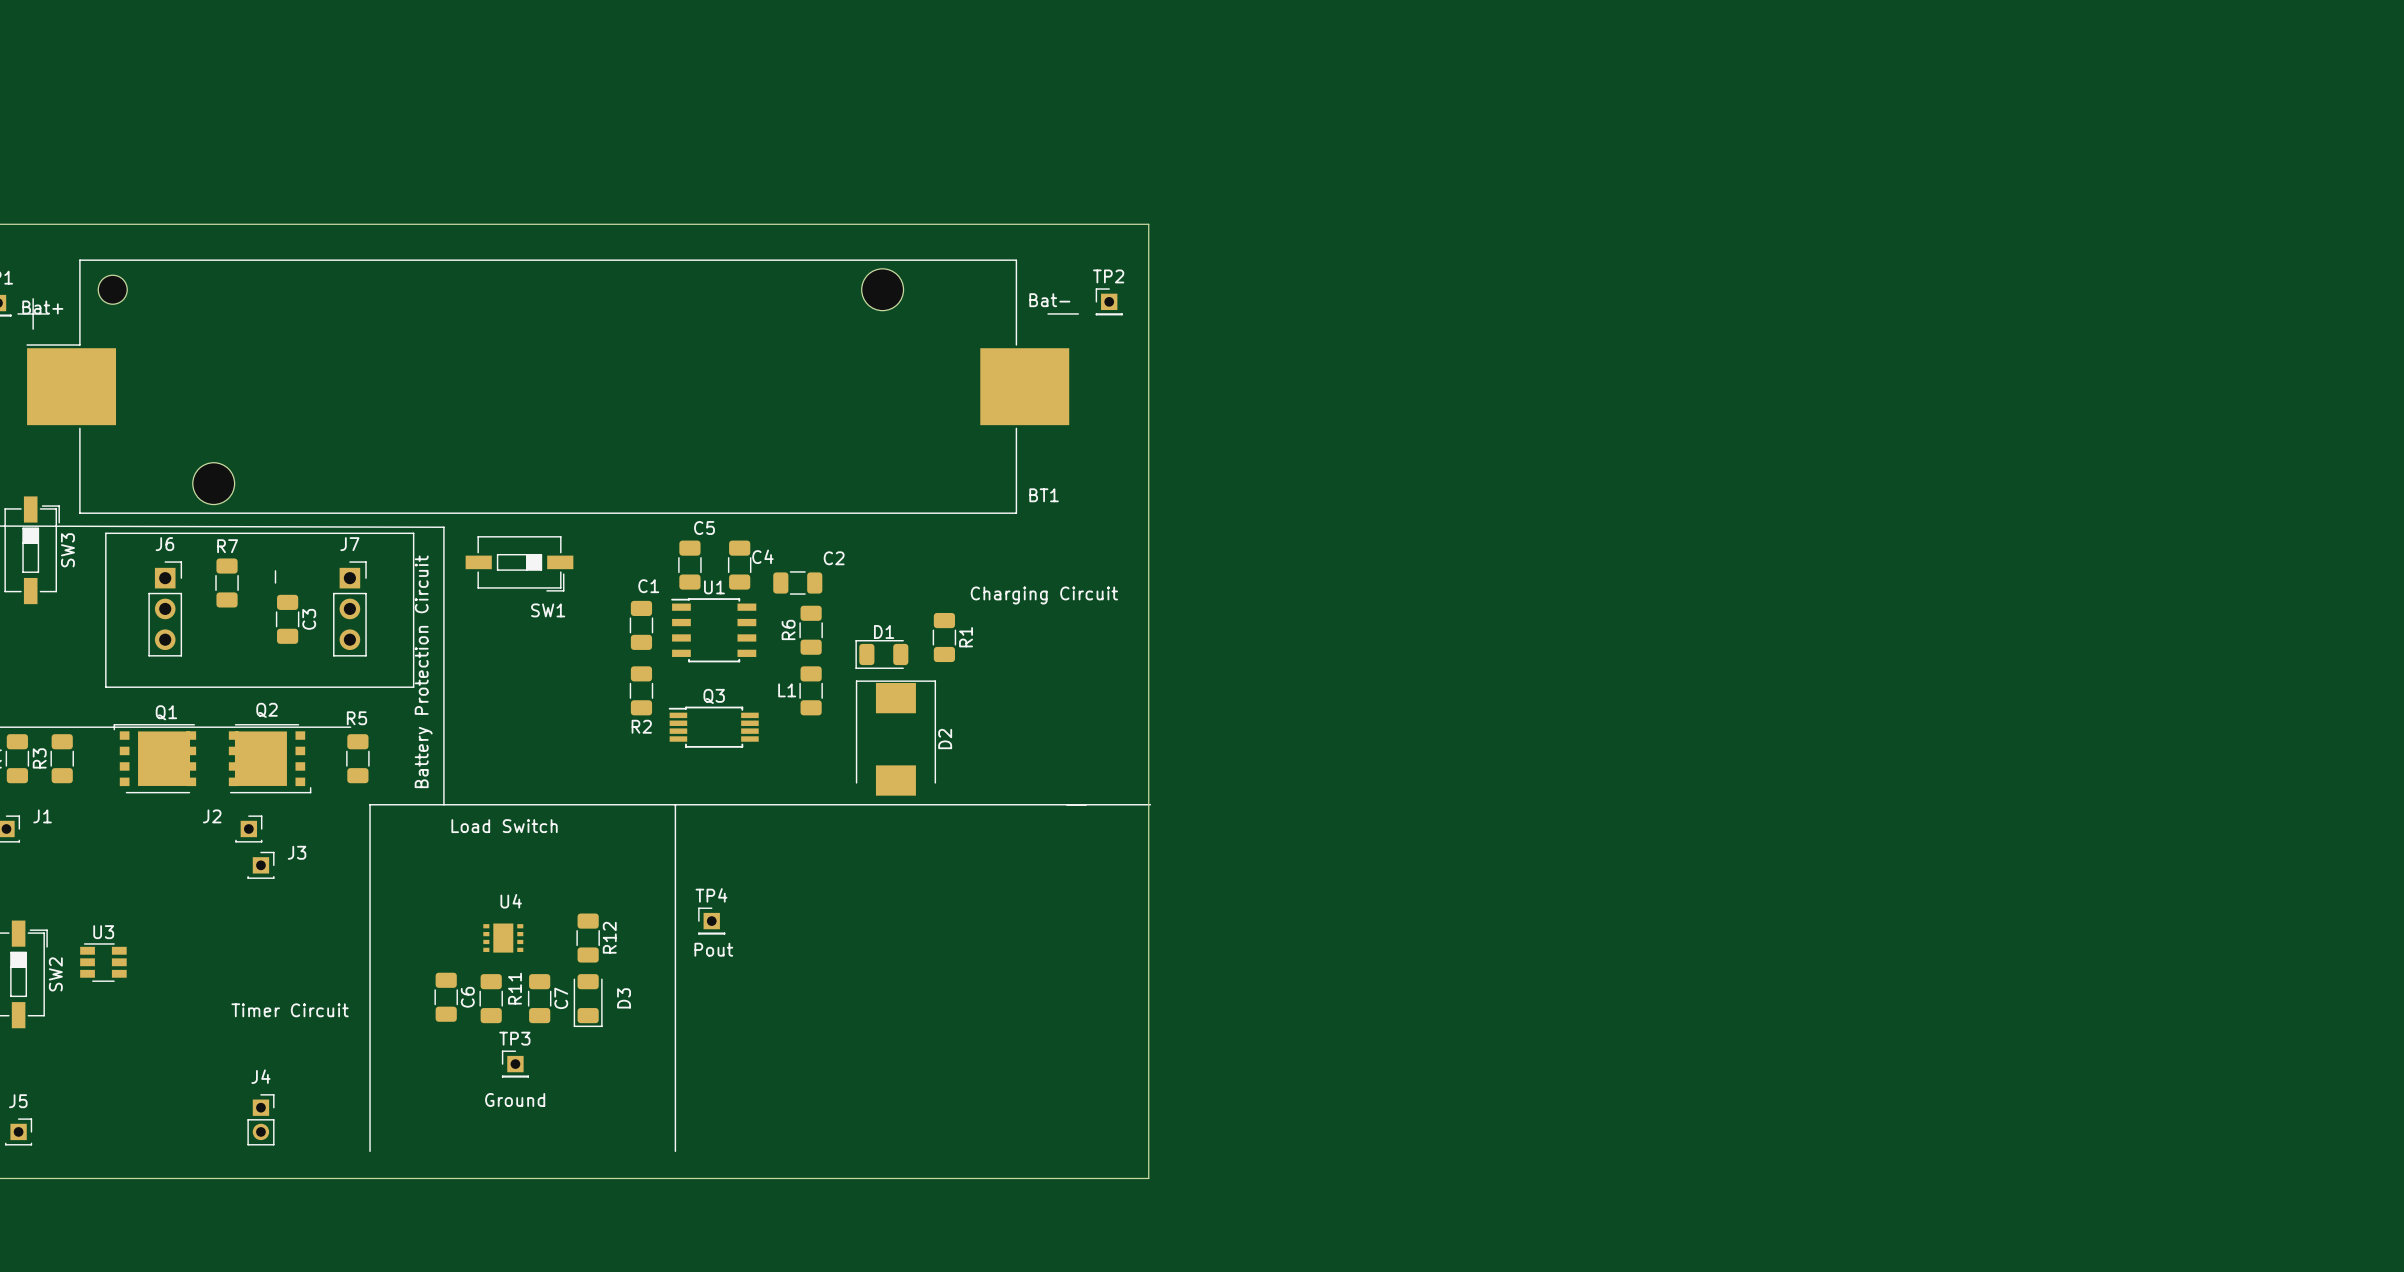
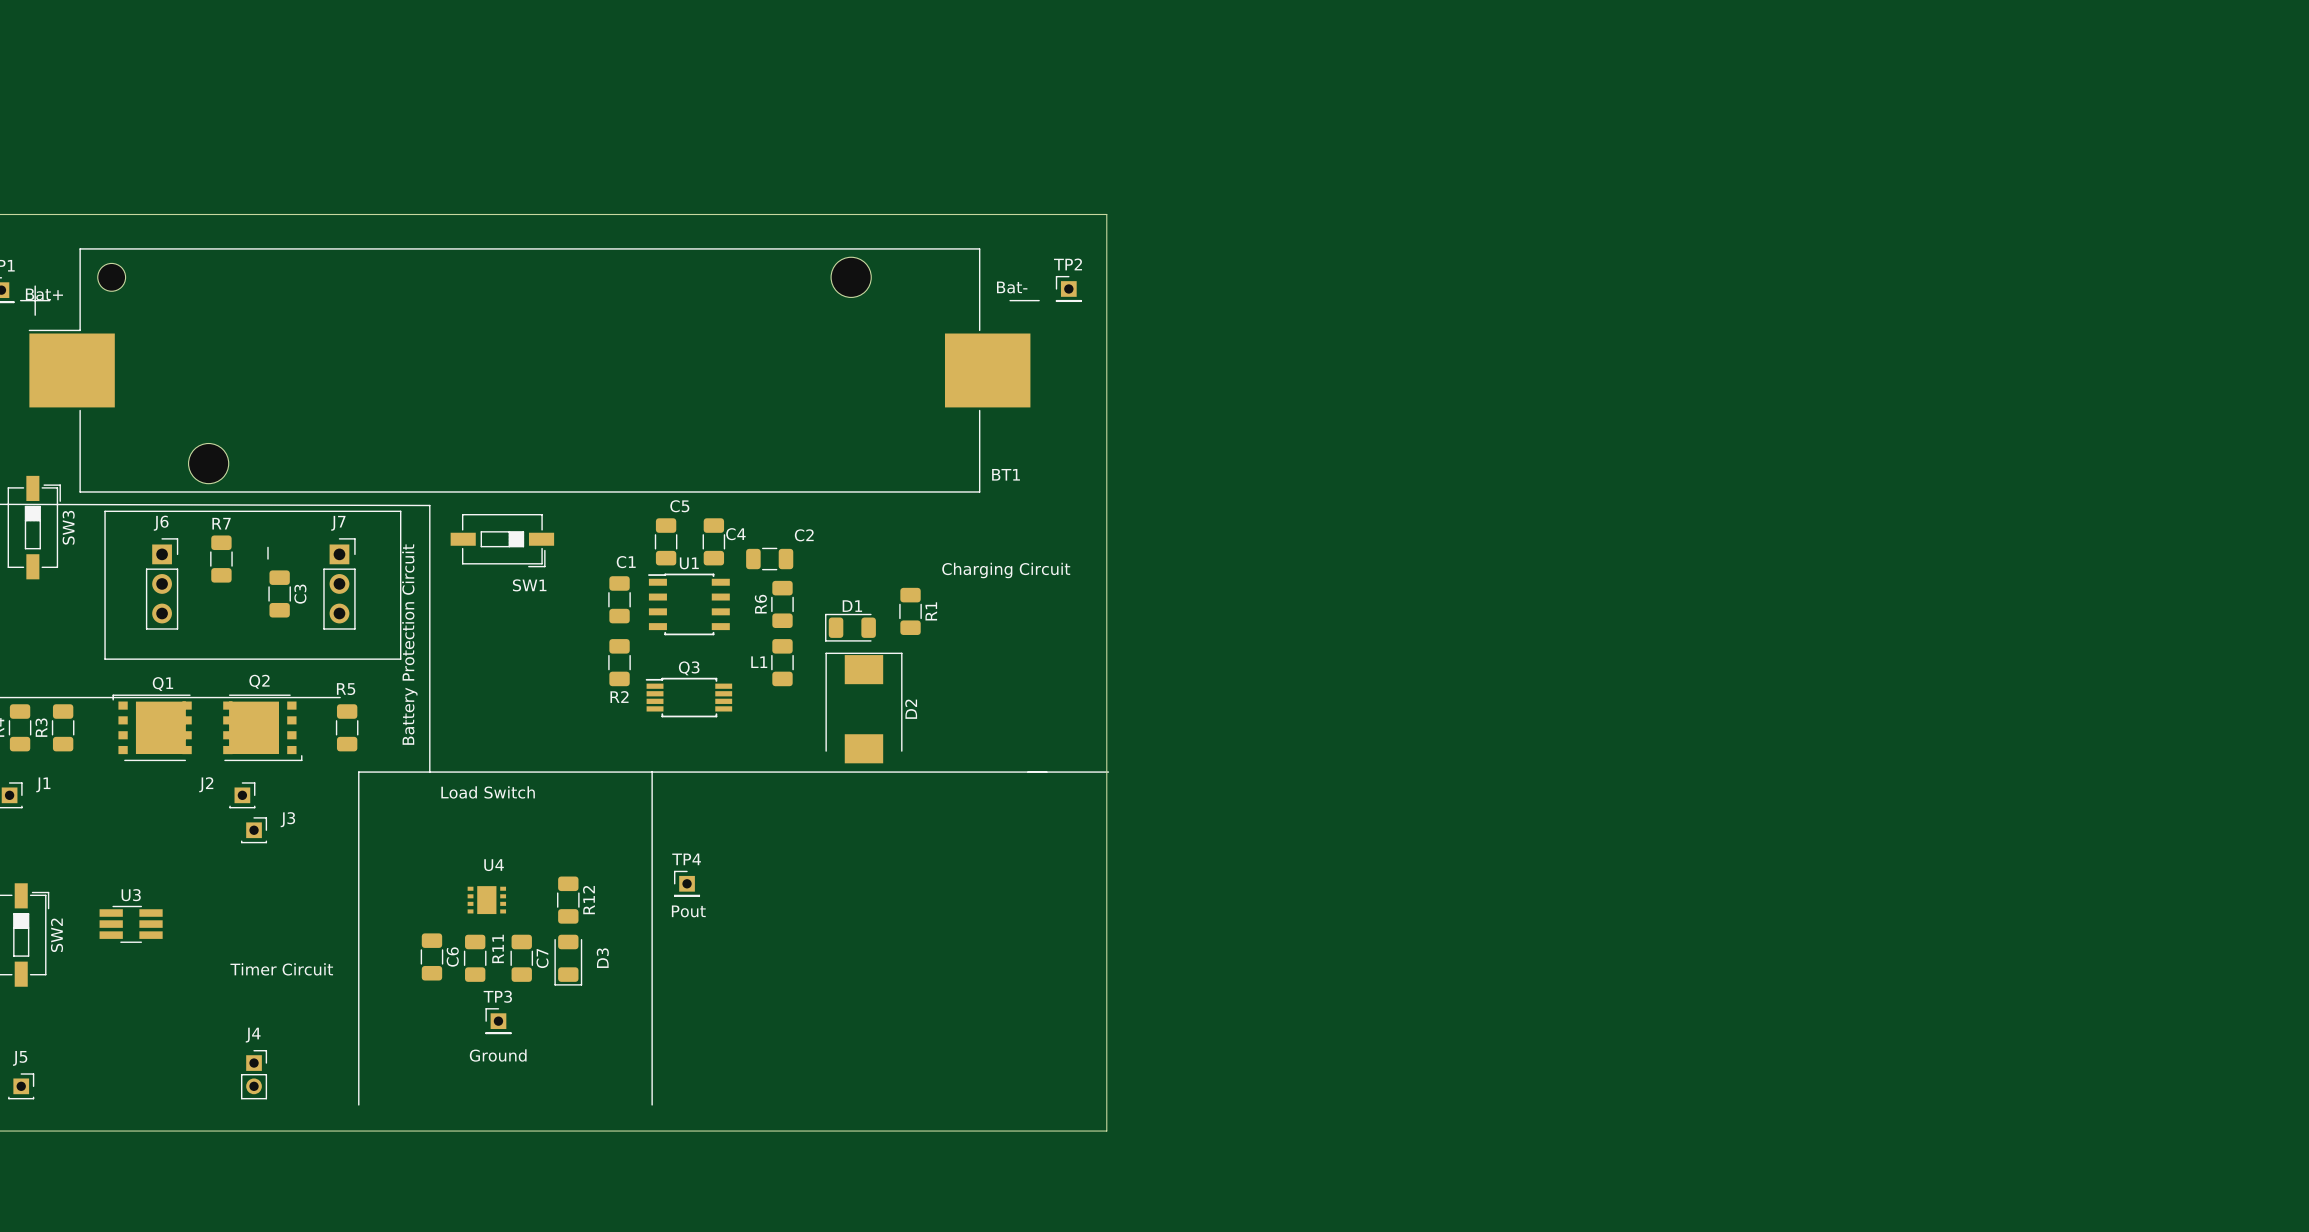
U3 footprint: [80, 943, 127, 982] -> [99, 905, 163, 943]

